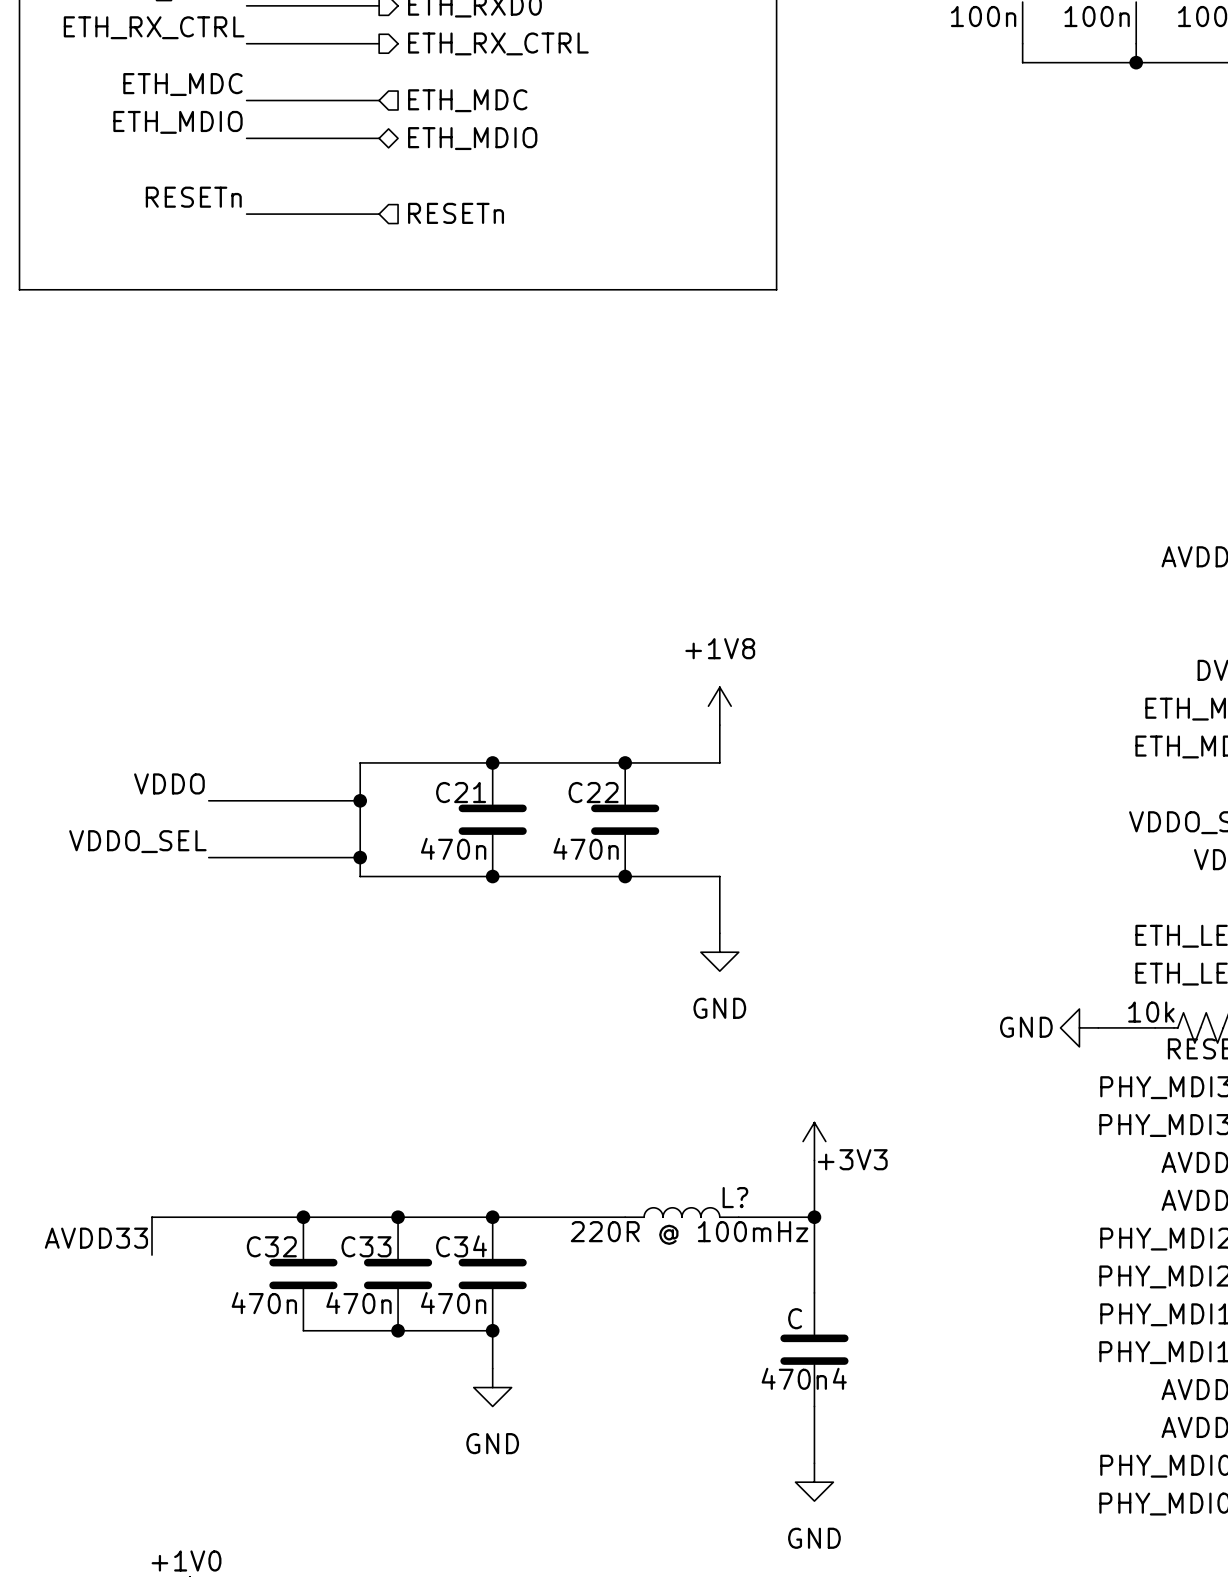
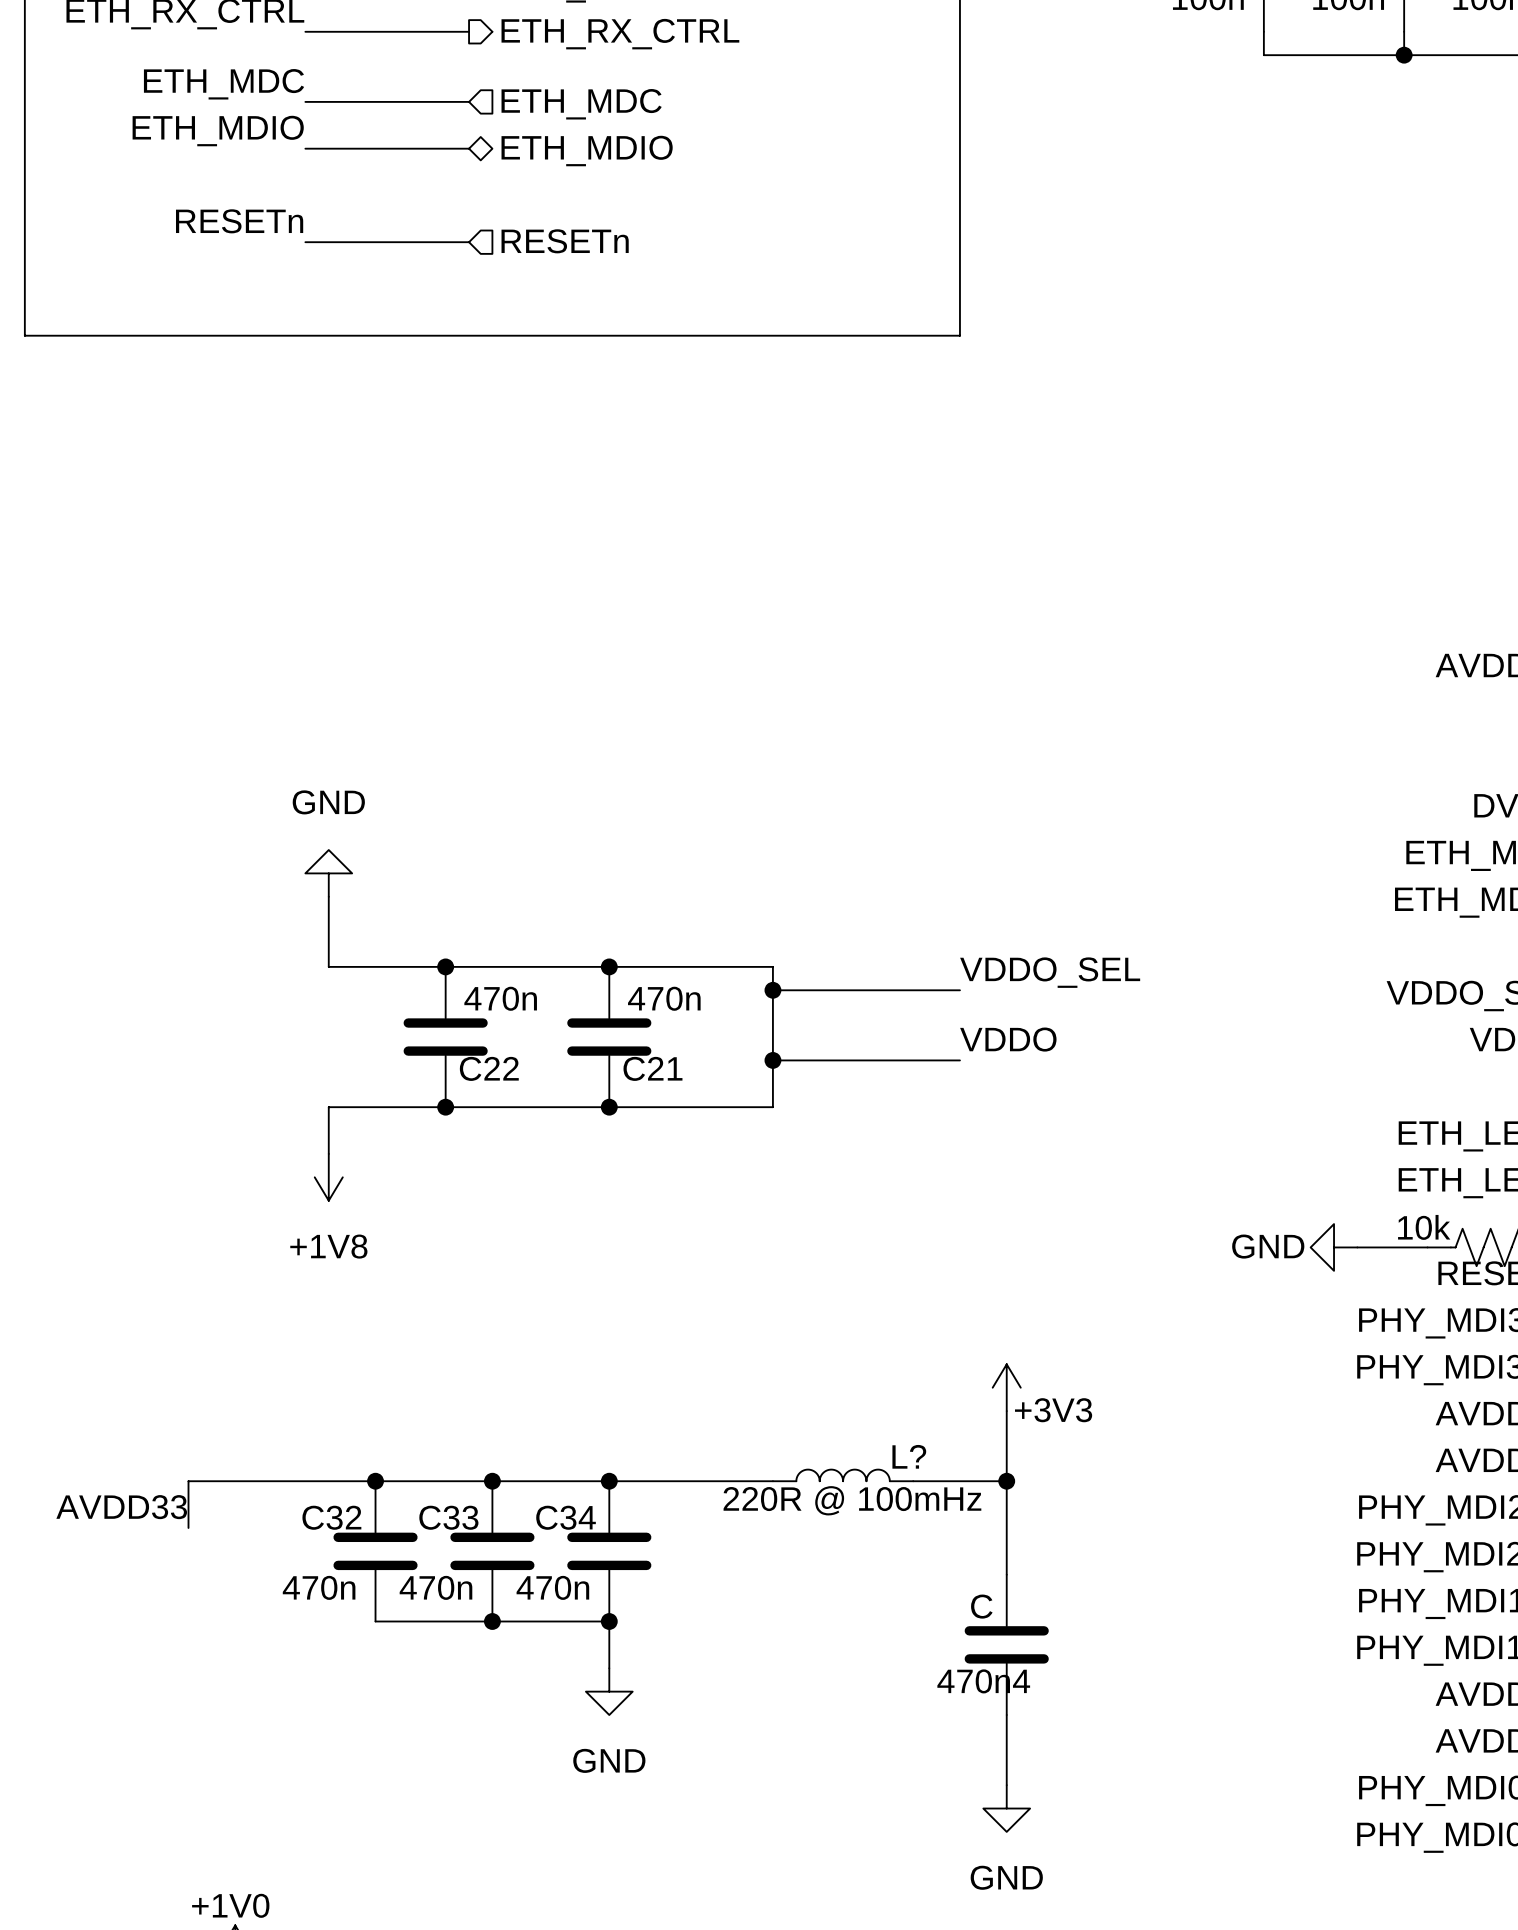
power symbol: +1V8 (719, 706) -> none
power symbol: none -> GND (328, 873)
wire: (719, 725) (719, 762) (360, 762) (360, 876) (625, 876) -> none
junction: (492, 762) -> none
junction position: (625, 762) -> (772, 990)
label: VDDO (169, 783) -> none
C21 name position: C21 (461, 792) -> C21 (652, 1068)
C22 name position: C22 (593, 792) -> C22 (489, 1068)
wire: (208, 800) (265, 800) -> (328, 896) (328, 966)
wire: none -> (445, 966) (772, 966) (772, 1107) (328, 1107) (328, 1153)
junction: none -> (609, 966)
label: none -> VDDO_SEL (1050, 972)
C21 position: (492, 819) -> (609, 1037)
wire: none -> (772, 990) (959, 990)
C22 position: (625, 819) -> (445, 1037)
label: VDDO_SEL (137, 841) -> none
C21 value position: 470n (453, 848) -> 470n (664, 998)
C22 value position: 470n (586, 848) -> 470n (500, 998)
wire: (208, 857) (360, 857) -> none
junction position: (360, 857) -> (445, 1107)
label: none -> VDDO (1008, 1039)
junction: (492, 876) -> none
wire: (719, 876) (719, 933) -> (889, 1060) (959, 1060)
junction: none -> (609, 1107)
power symbol: GND (719, 952) -> none
power symbol: none -> +1V8 (328, 1177)

